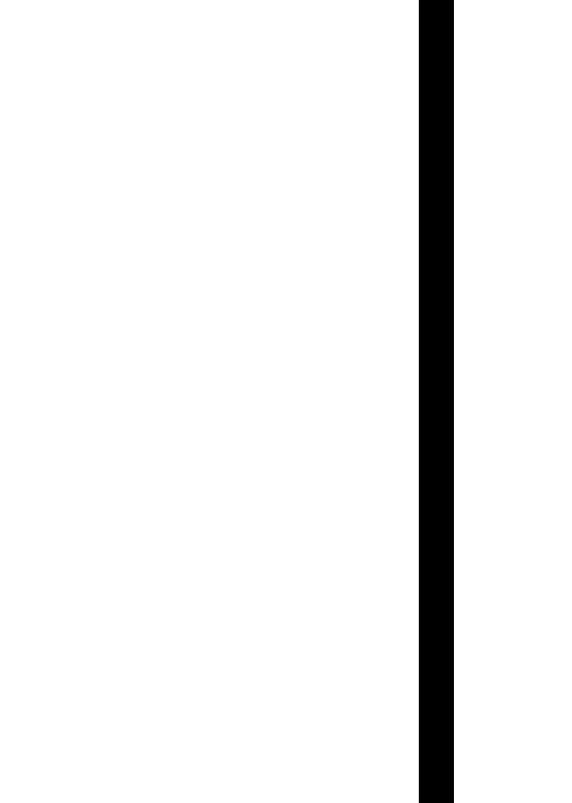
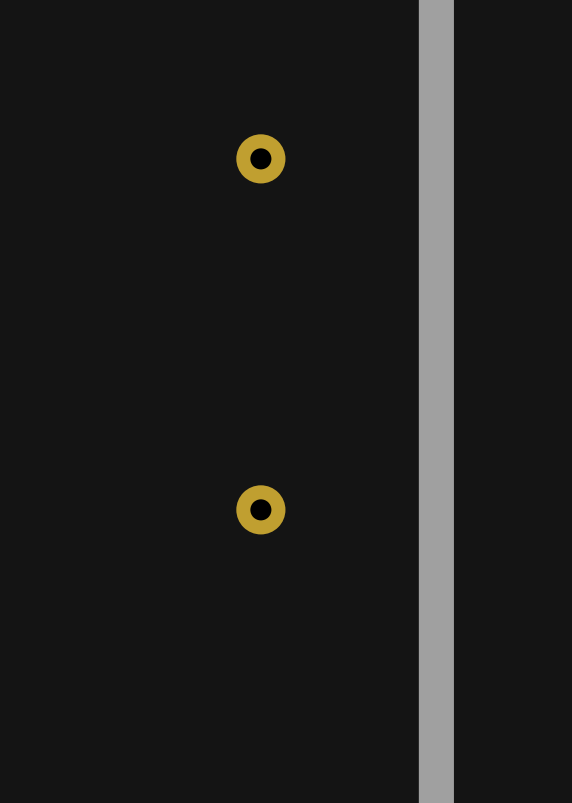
via: none -> (260, 158)
via: none -> (260, 509)

